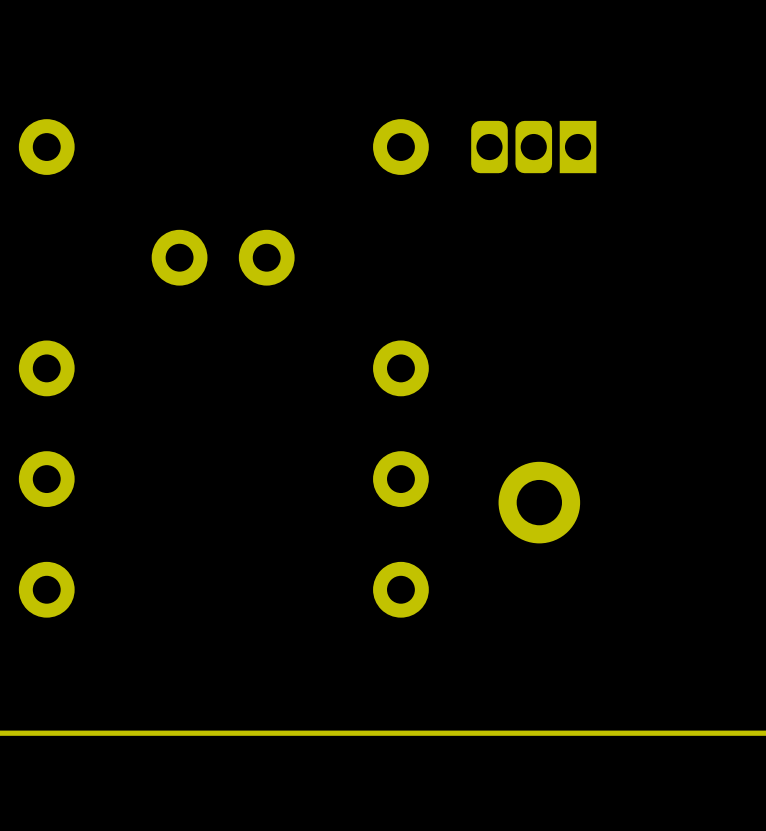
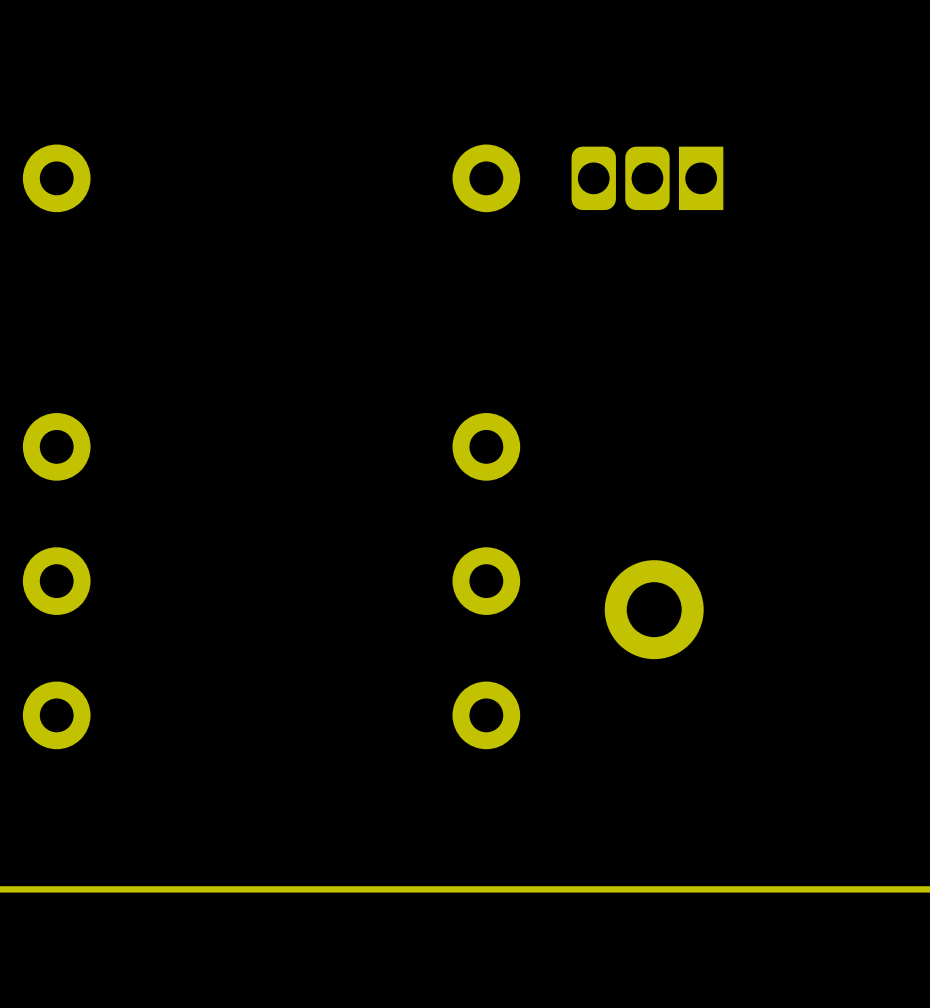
part: (223, 257) -> none

